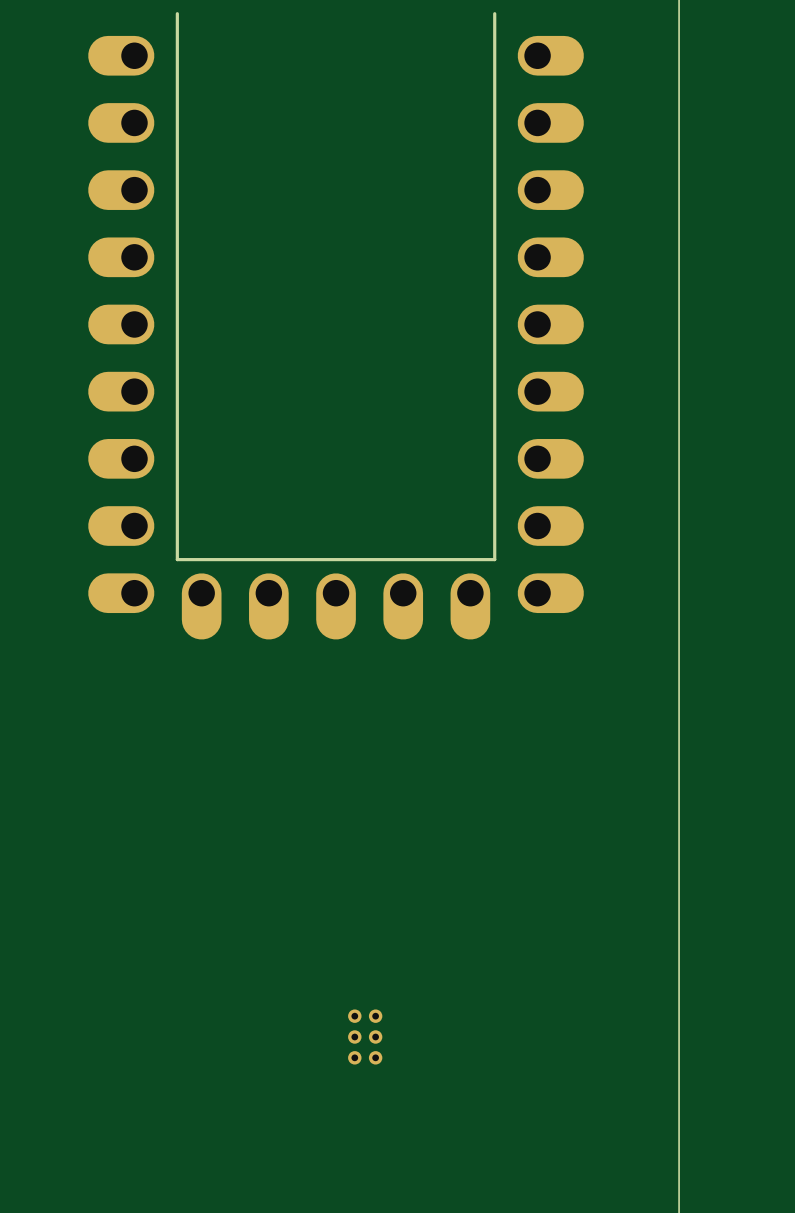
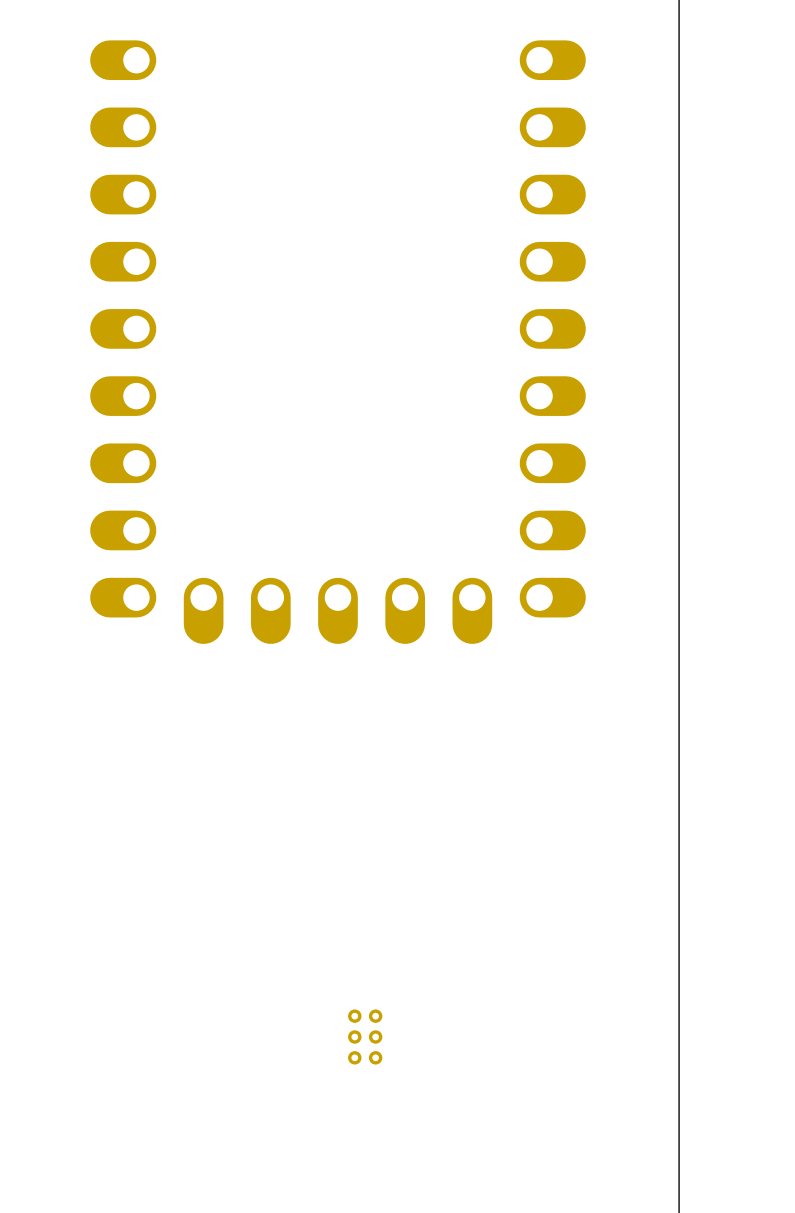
part footprint: [88, 12, 584, 640] -> [90, 40, 586, 644]

